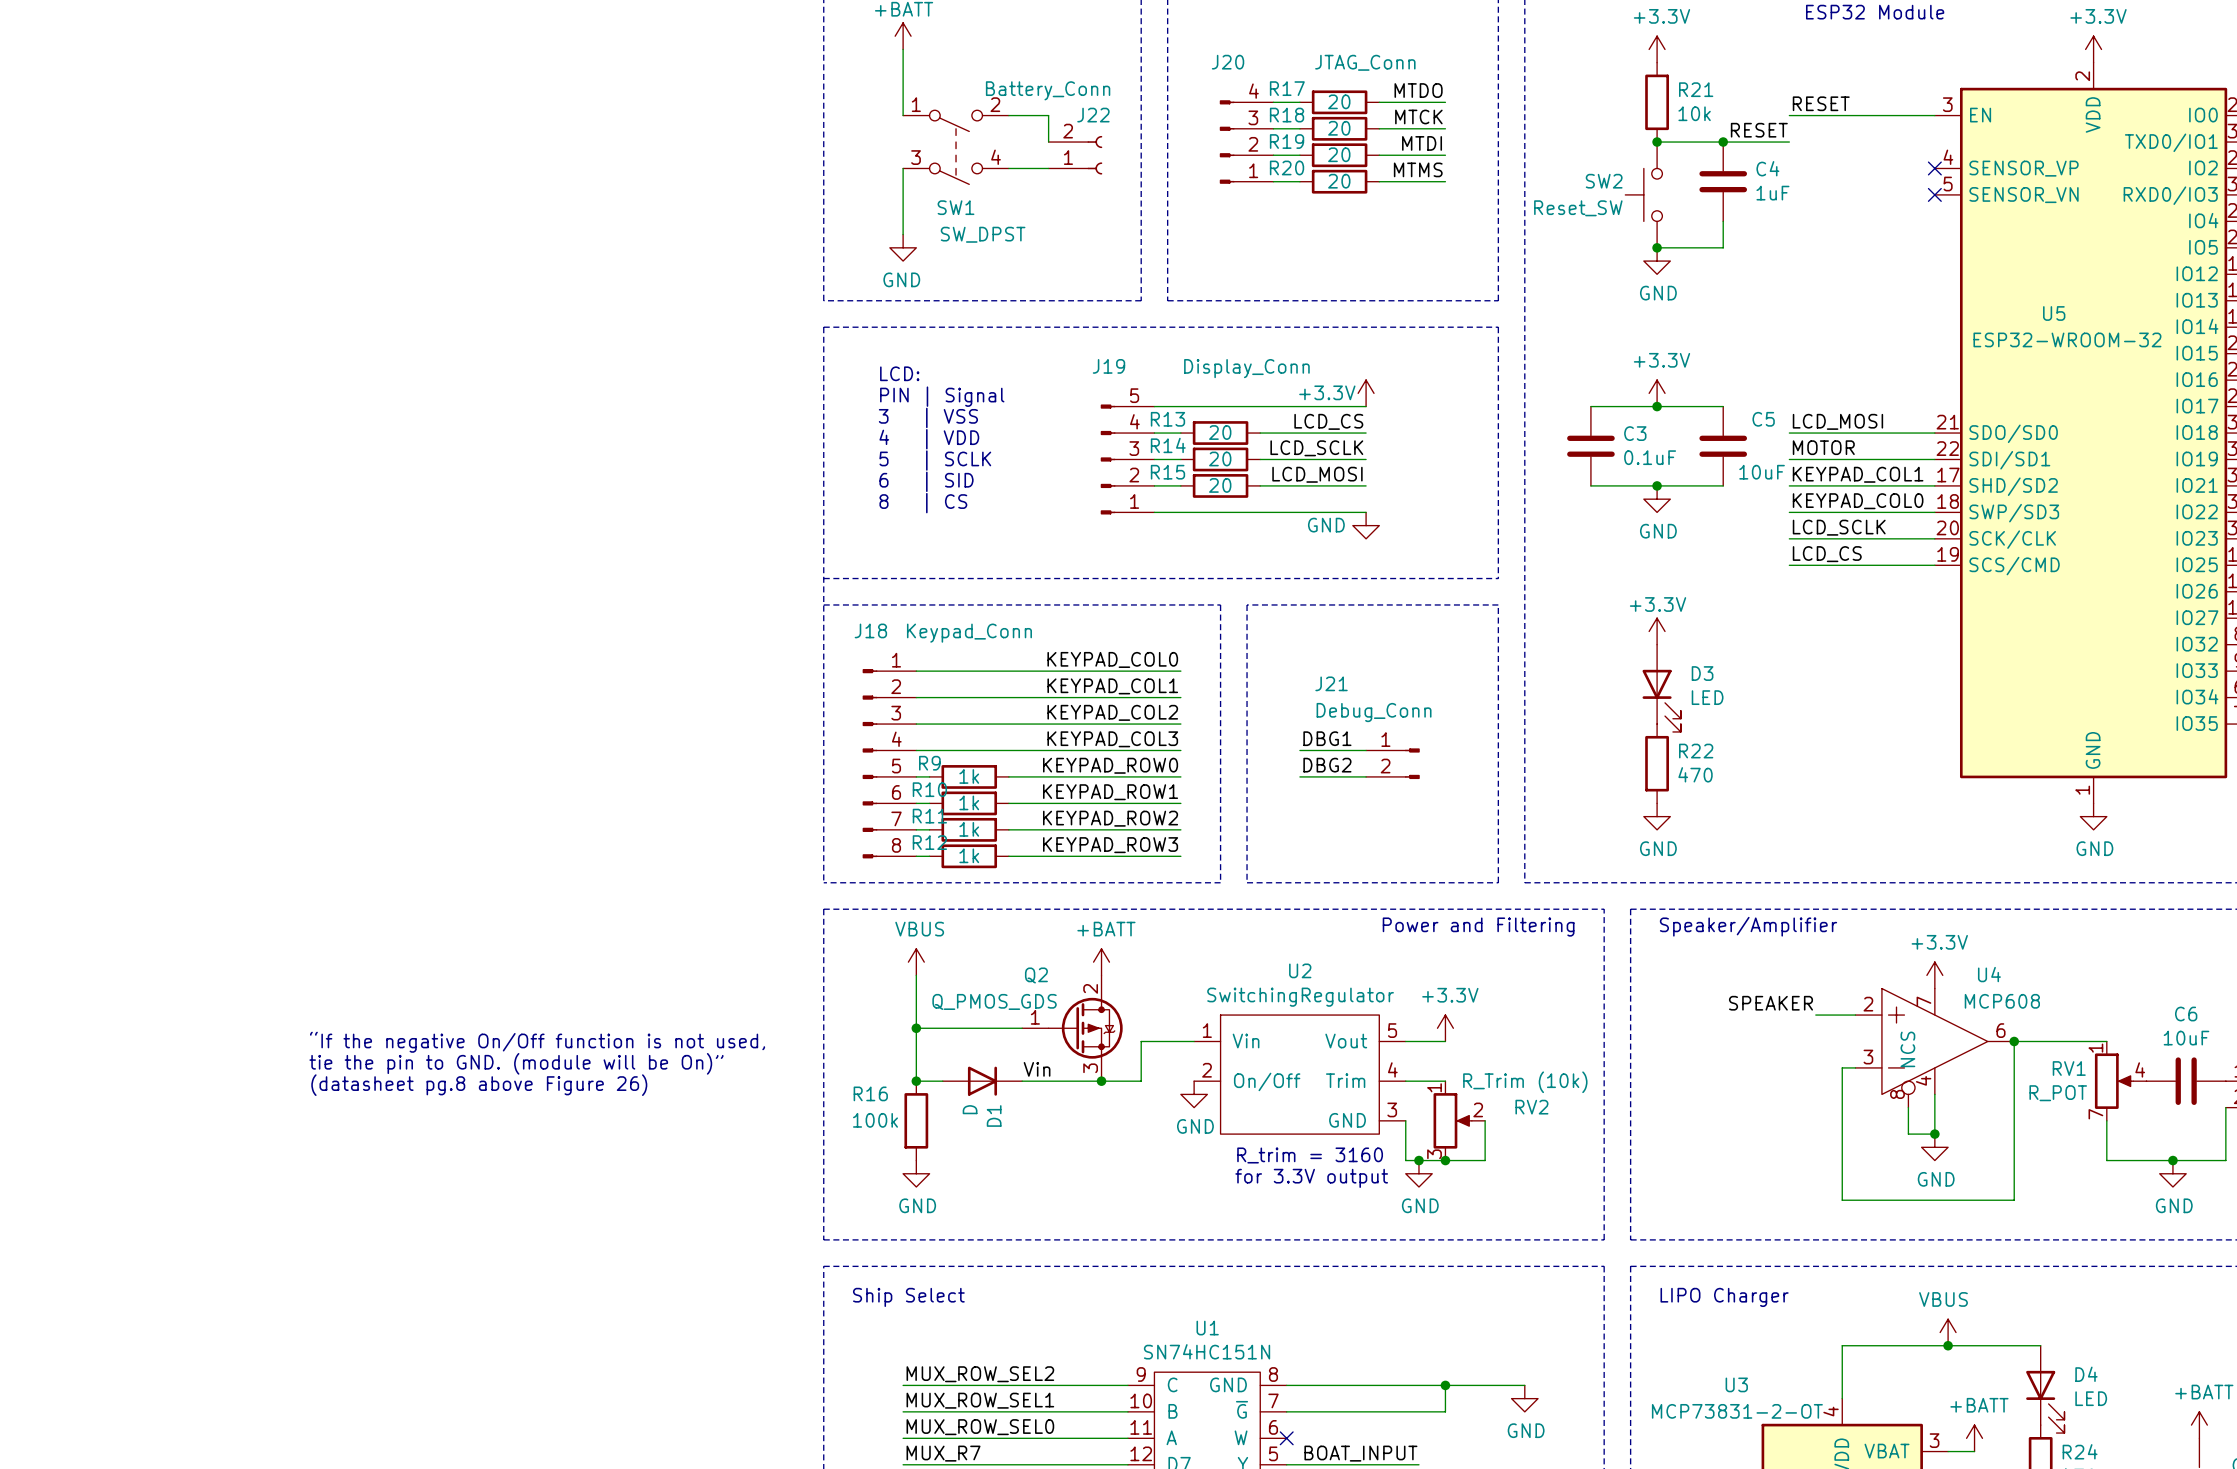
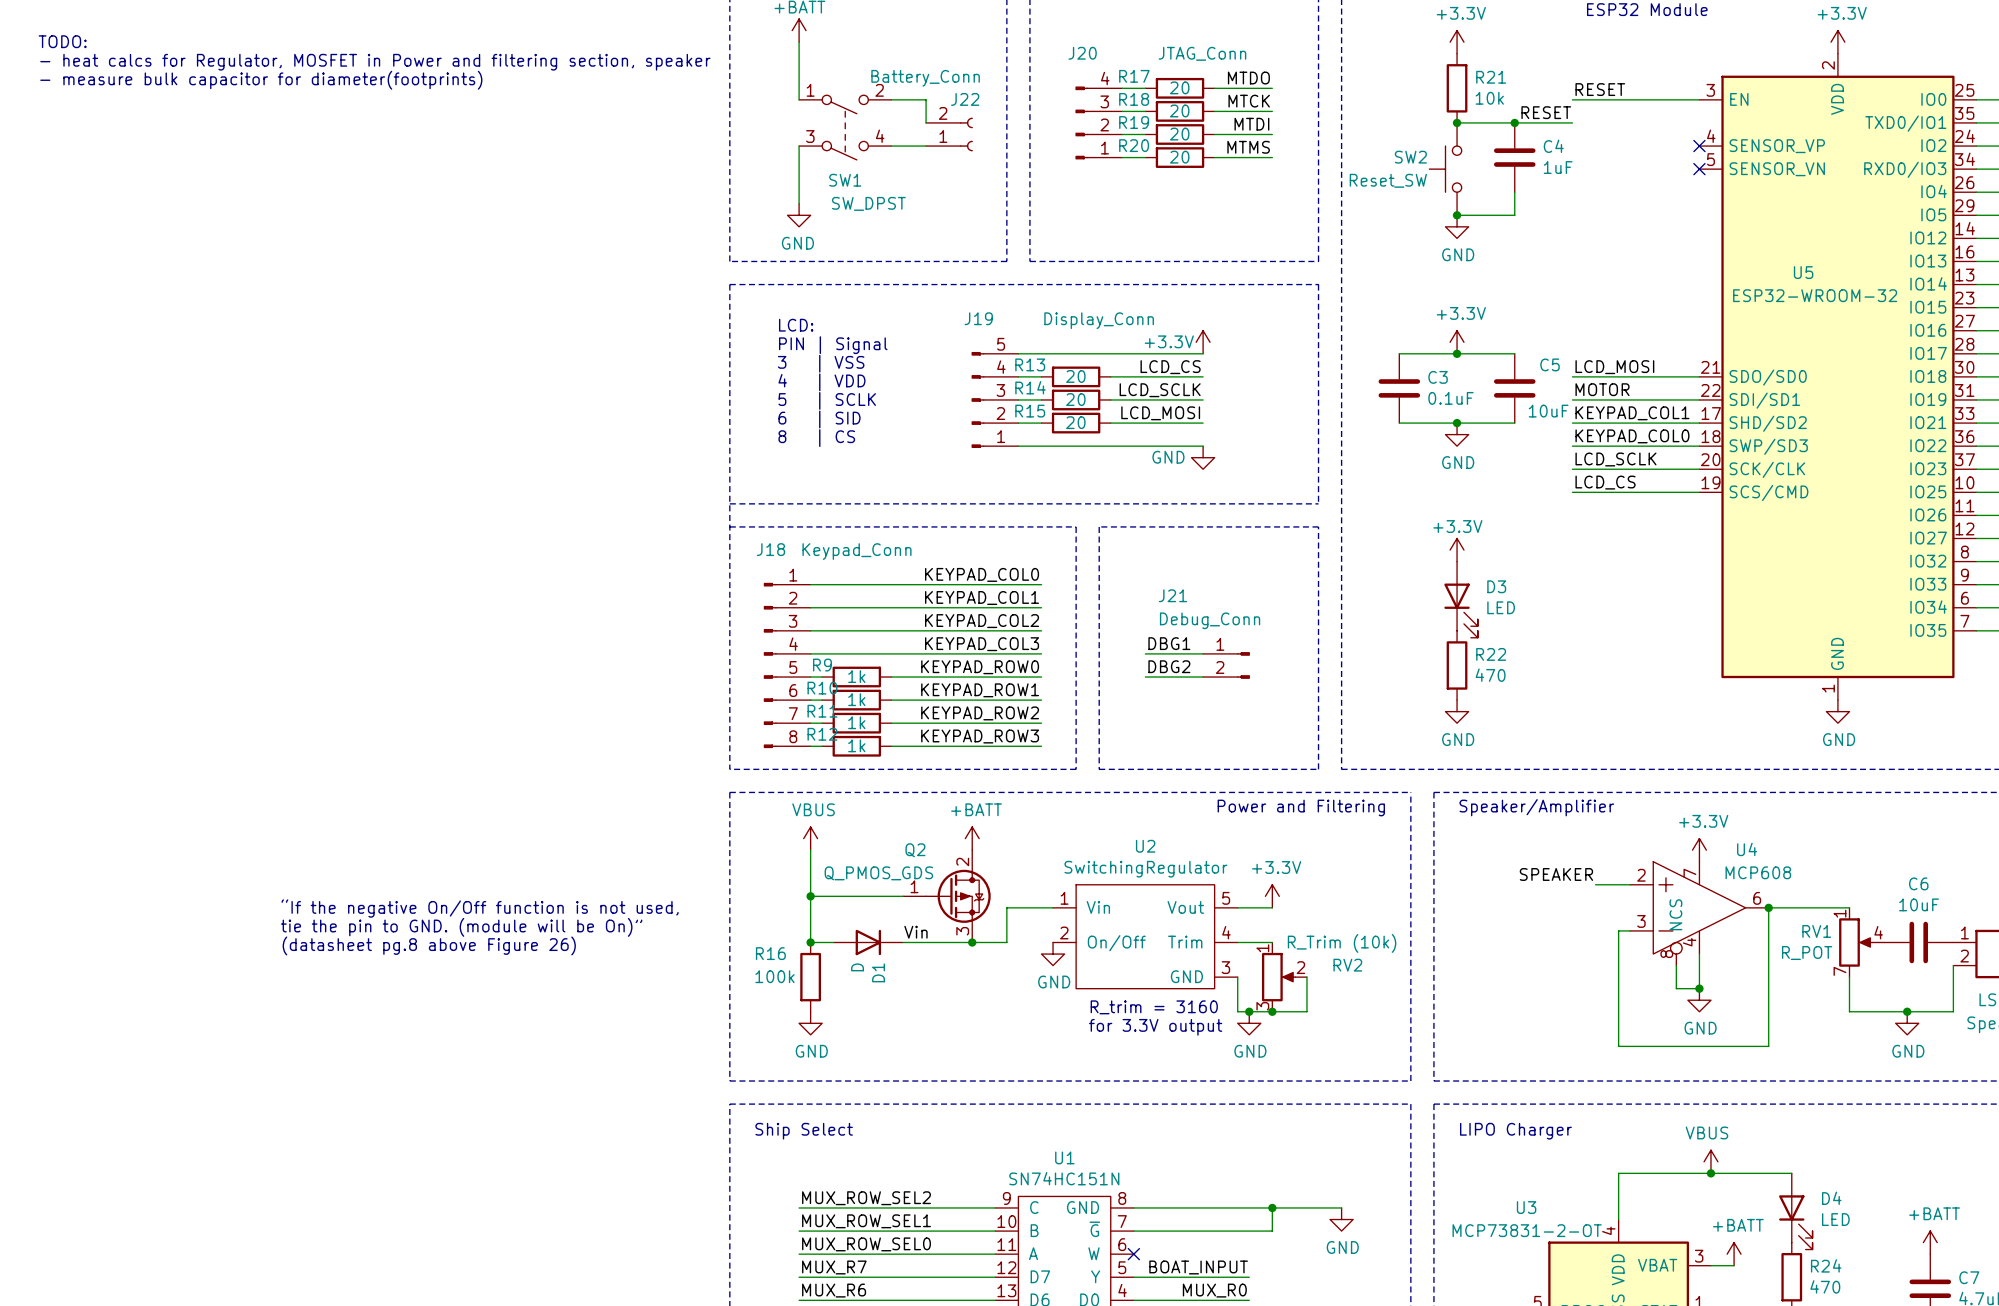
text: none -> TODO: (62, 41)
text: none -> - heat calcs for Regulator, MOSFET in Power and filtering section, speaker (375, 62)
text: none -> - measure bulk capacitor for diameter(footprints) (261, 80)

